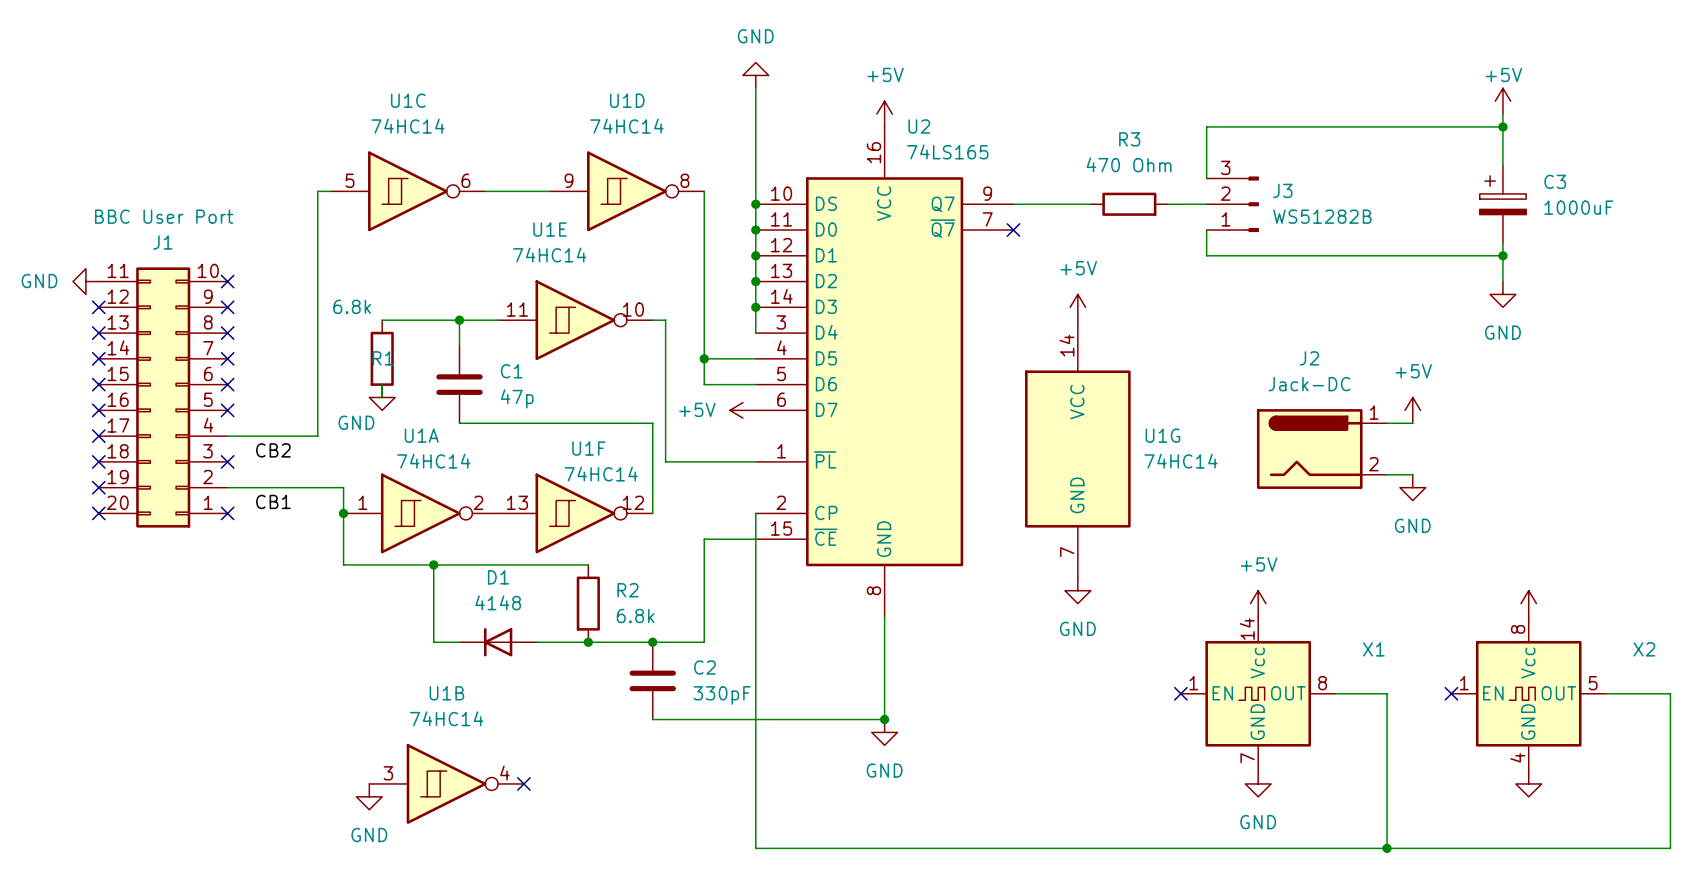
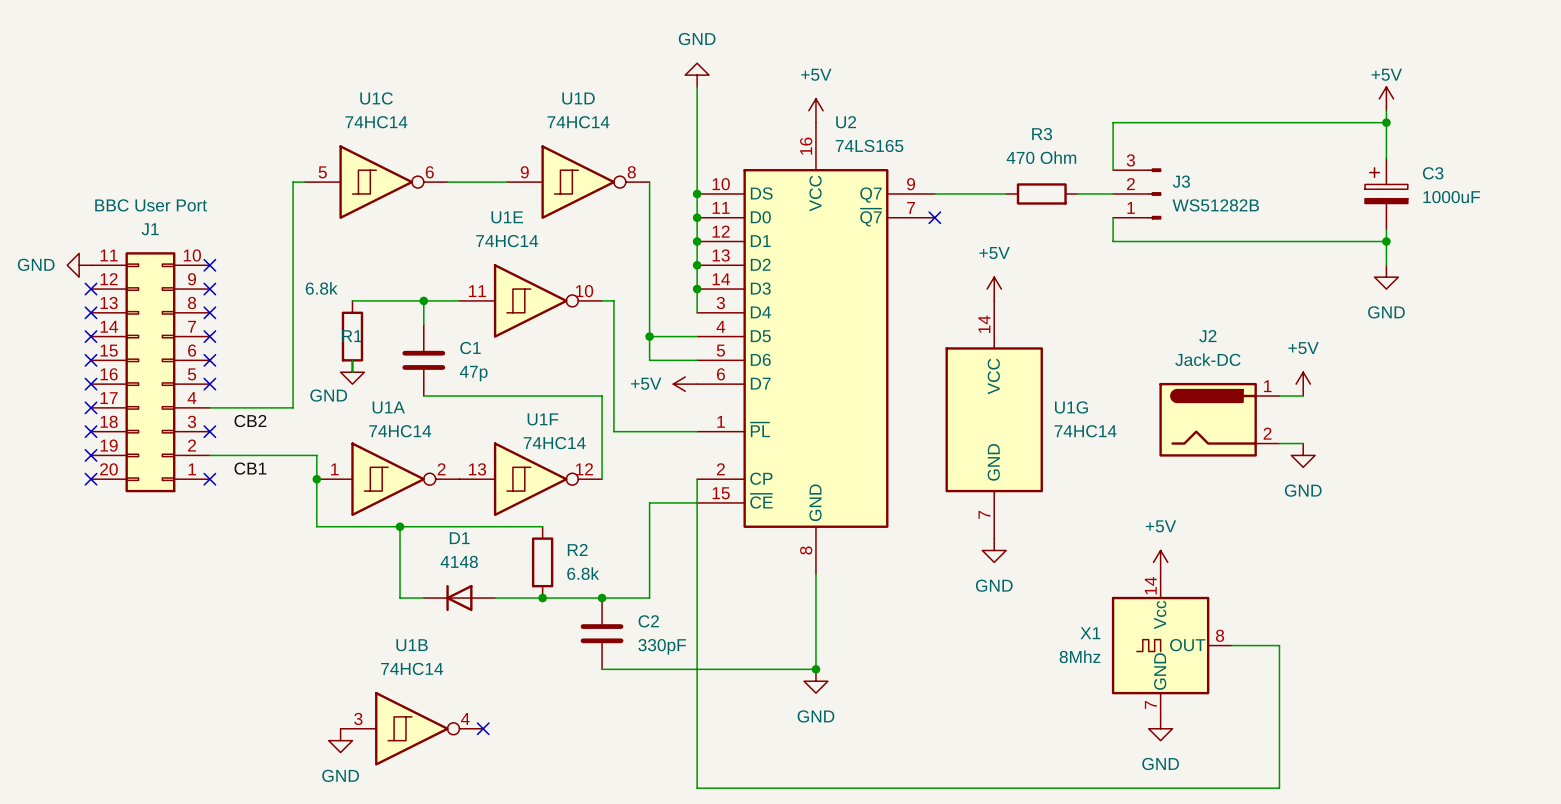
power symbol: (1528, 603) -> none
X1 symbol: [1180, 616, 1336, 772] -> [1111, 574, 1232, 717]
X1 name position: X1 (1373, 649) -> X1 (1090, 633)
no-connect mark: (1180, 693) -> none
no-connect mark: (1451, 693) -> none
X2: (1528, 693) -> none
wire: (1606, 693) (1670, 693) (1670, 848) (1387, 848) -> none
X1 value: none -> 8Mhz (1080, 656)
power symbol: (1528, 783) -> none
junction: (1387, 848) -> none

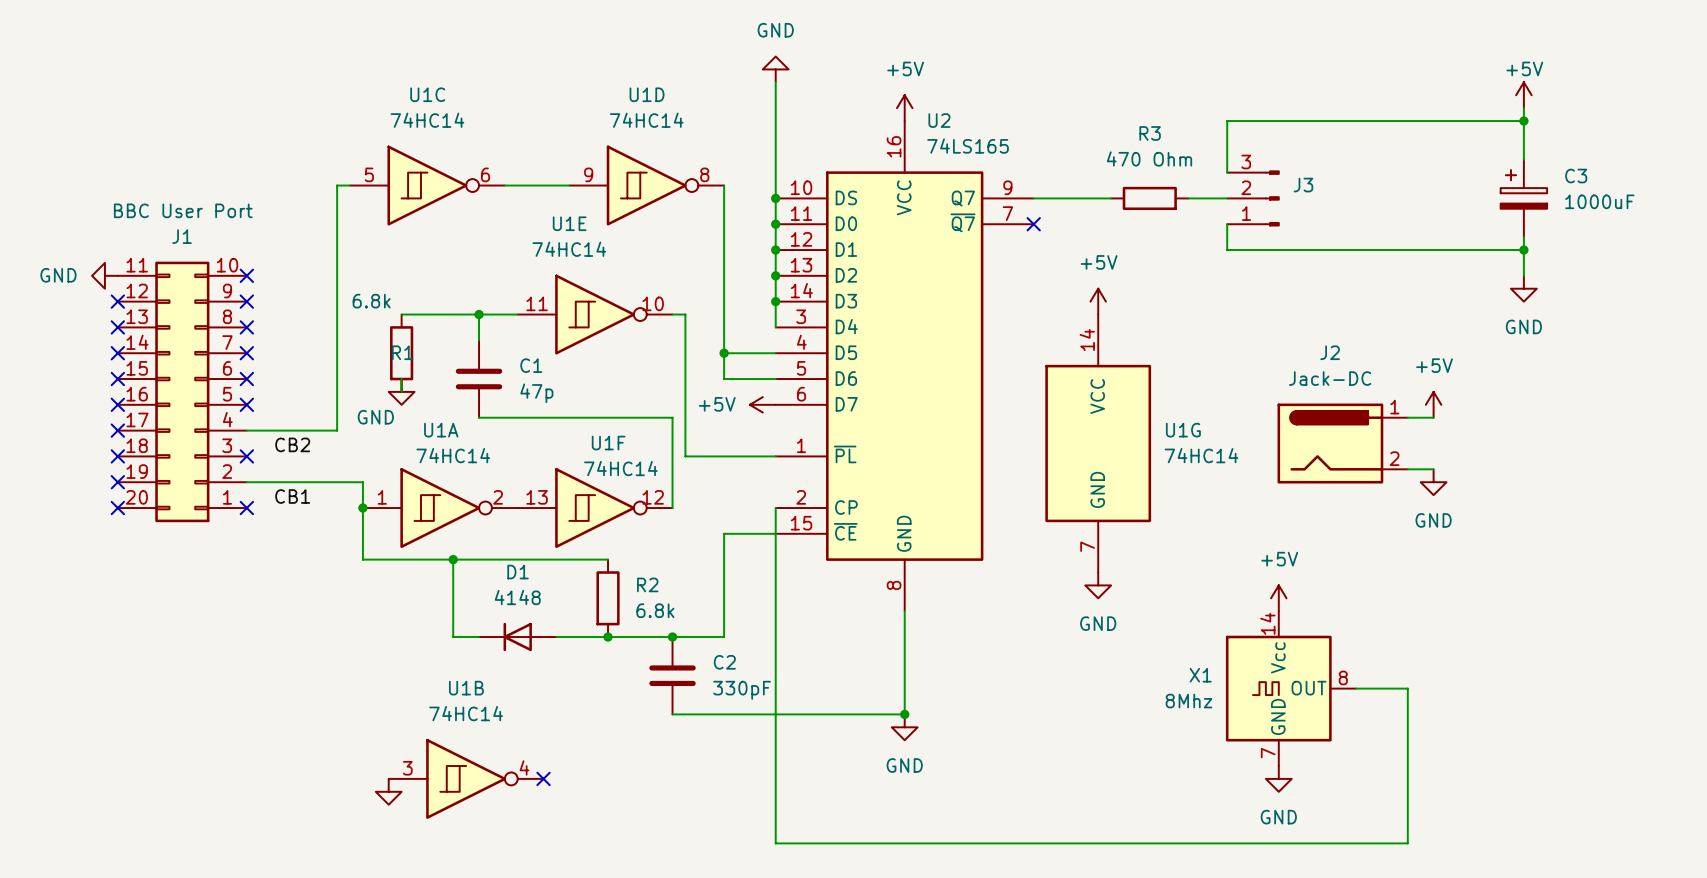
J3 value: WS51282B (1215, 205) -> none
power symbol text: GND (340, 775) -> none

